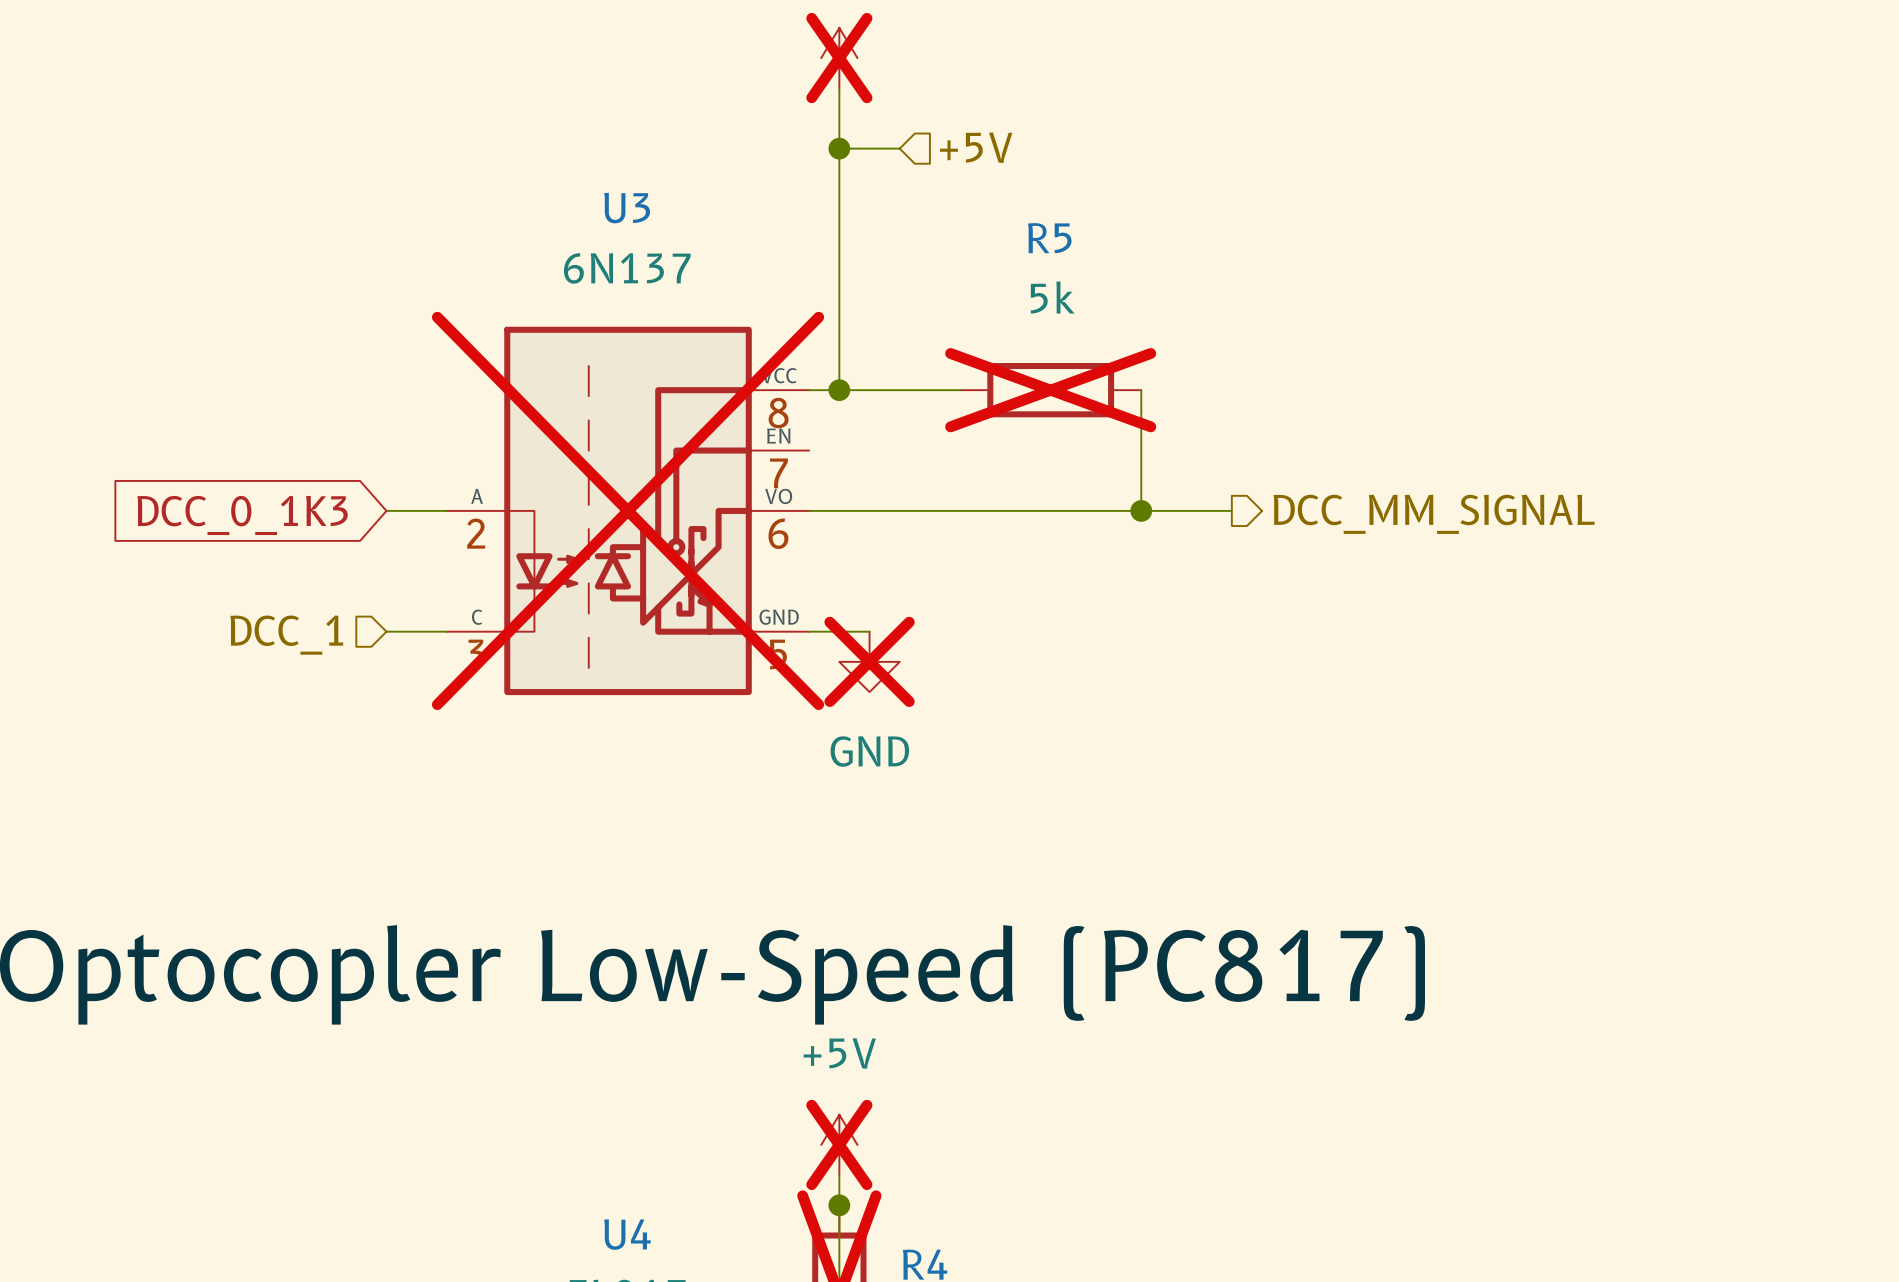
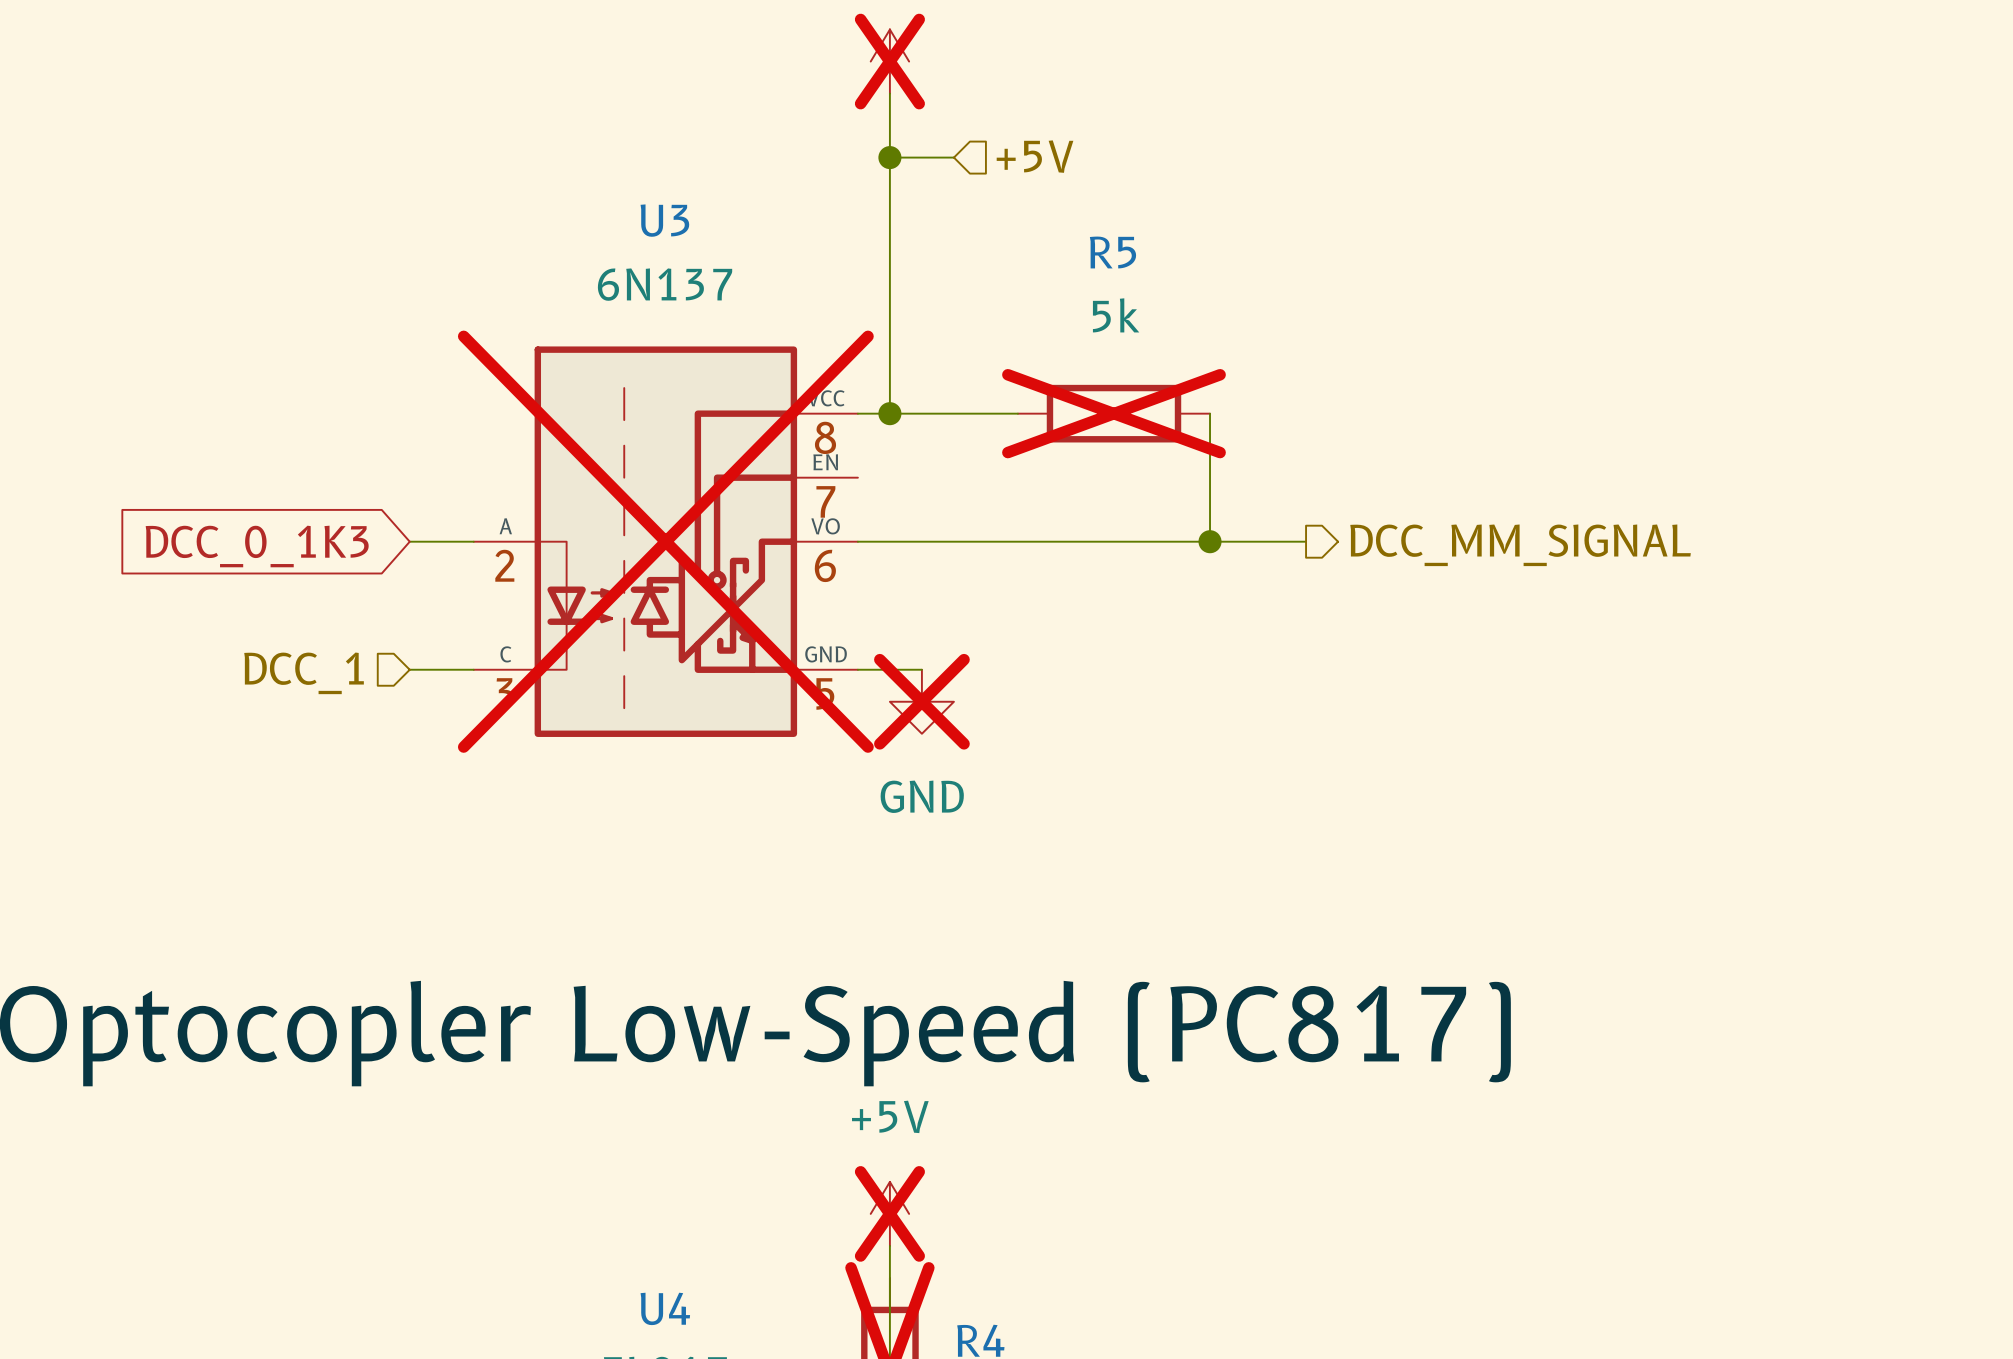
junction: (839, 1205) -> none

